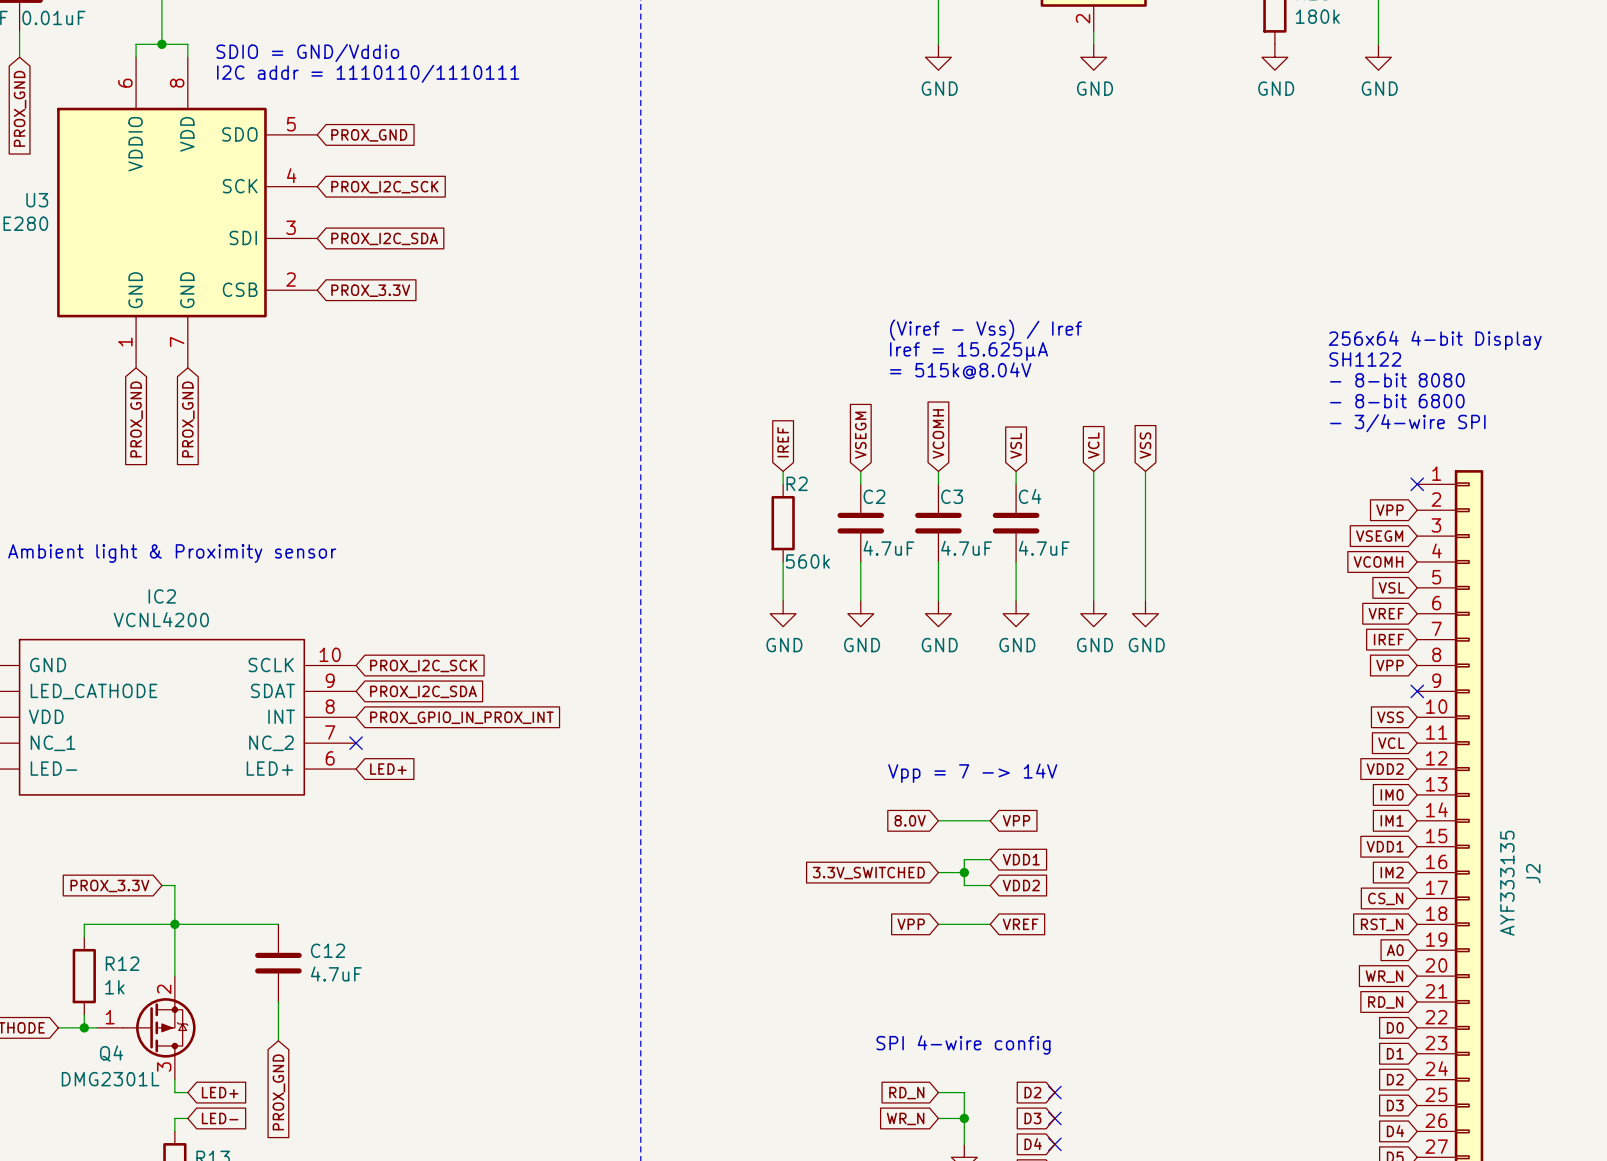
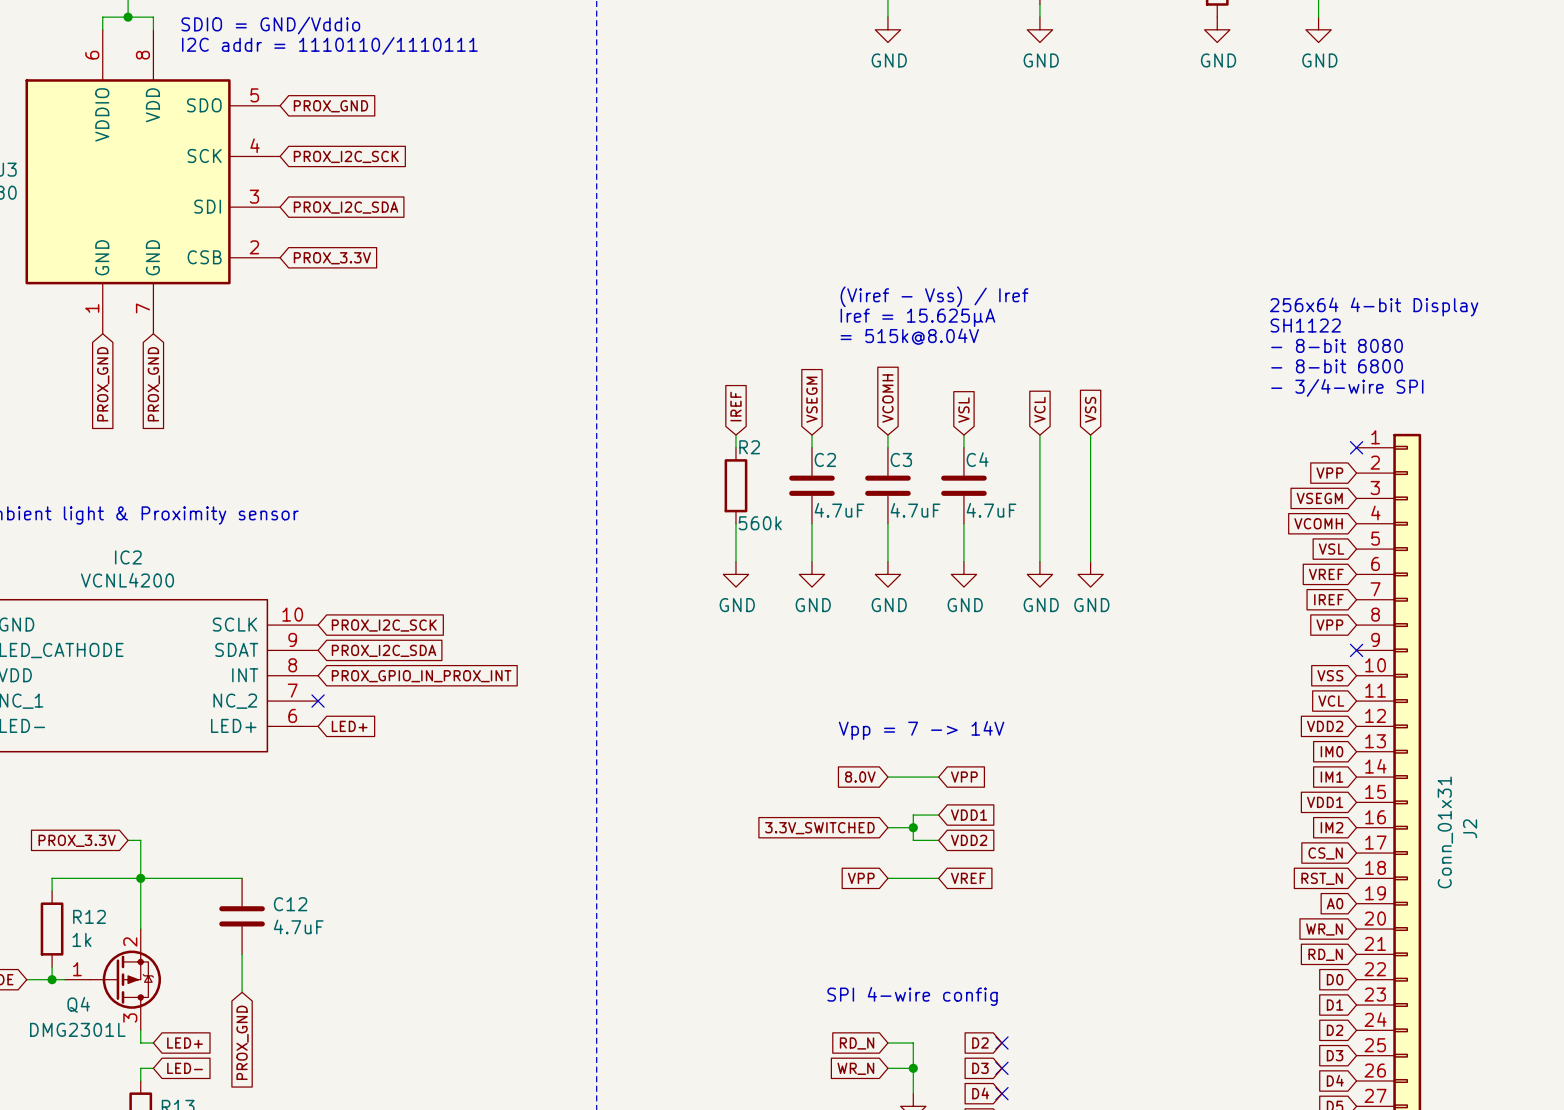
J2 value: AYF333135 (1507, 883) -> Conn_01x31 (1445, 832)

